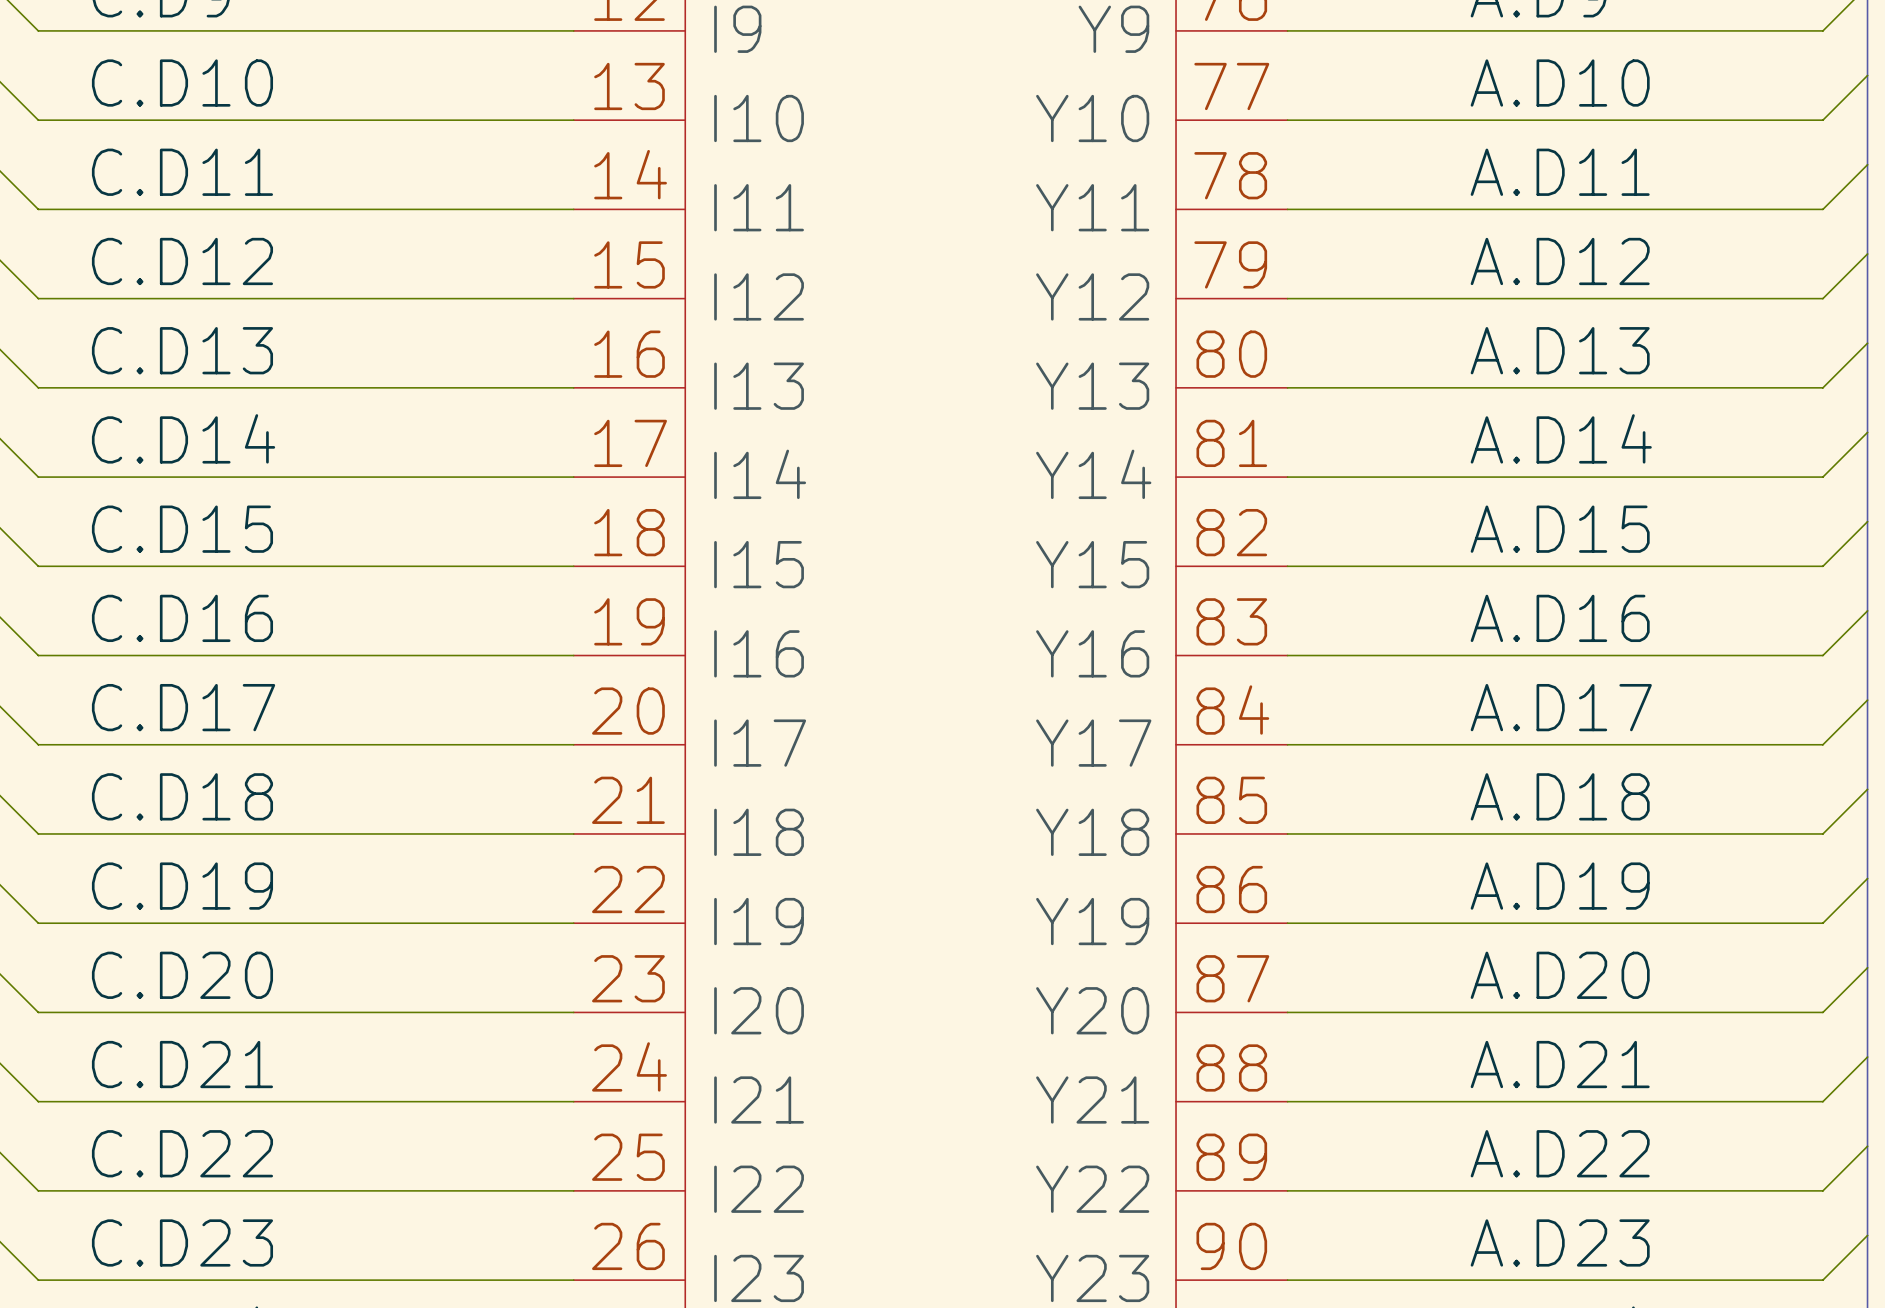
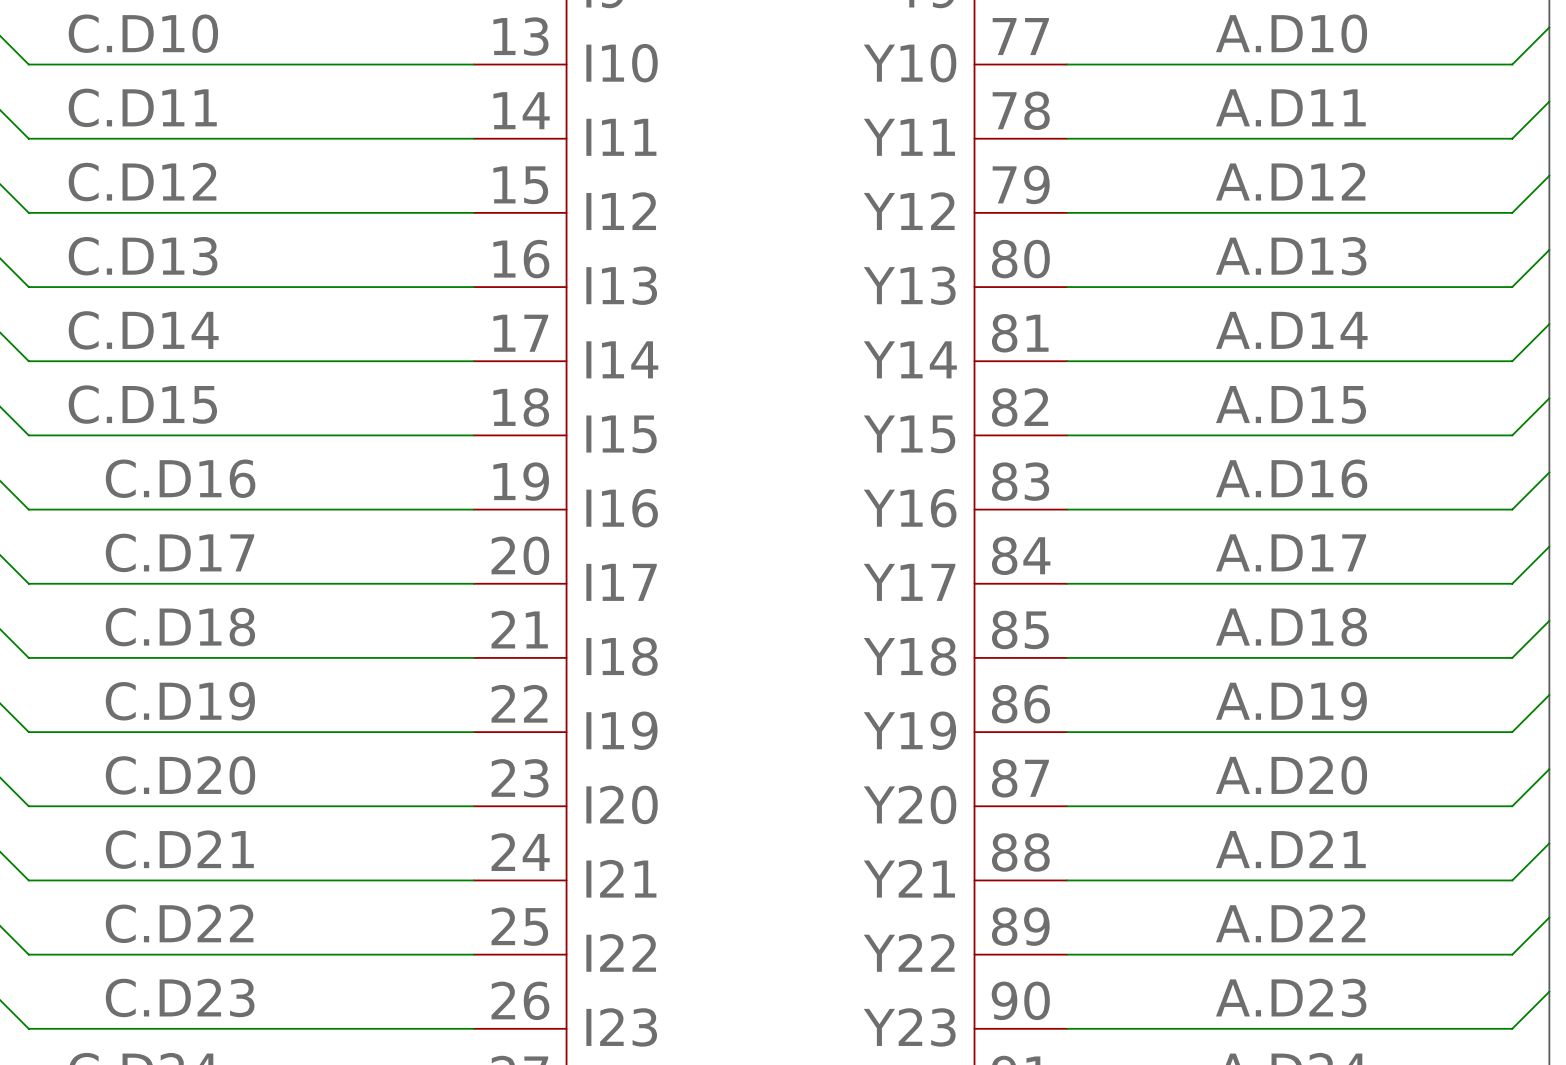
label position: C.D16 (182, 618) -> C.D16 (180, 478)
label position: C.D17 (183, 707) -> C.D17 (180, 552)
label position: C.D18 (182, 796) -> C.D18 (180, 627)
label position: C.D19 (182, 886) -> C.D19 (180, 701)
label position: C.D20 (182, 975) -> C.D20 (180, 775)
label position: C.D21 (182, 1064) -> C.D21 (179, 849)
label position: C.D22 (182, 1153) -> C.D22 (179, 923)
label position: C.D23 (182, 1242) -> C.D23 (180, 997)

